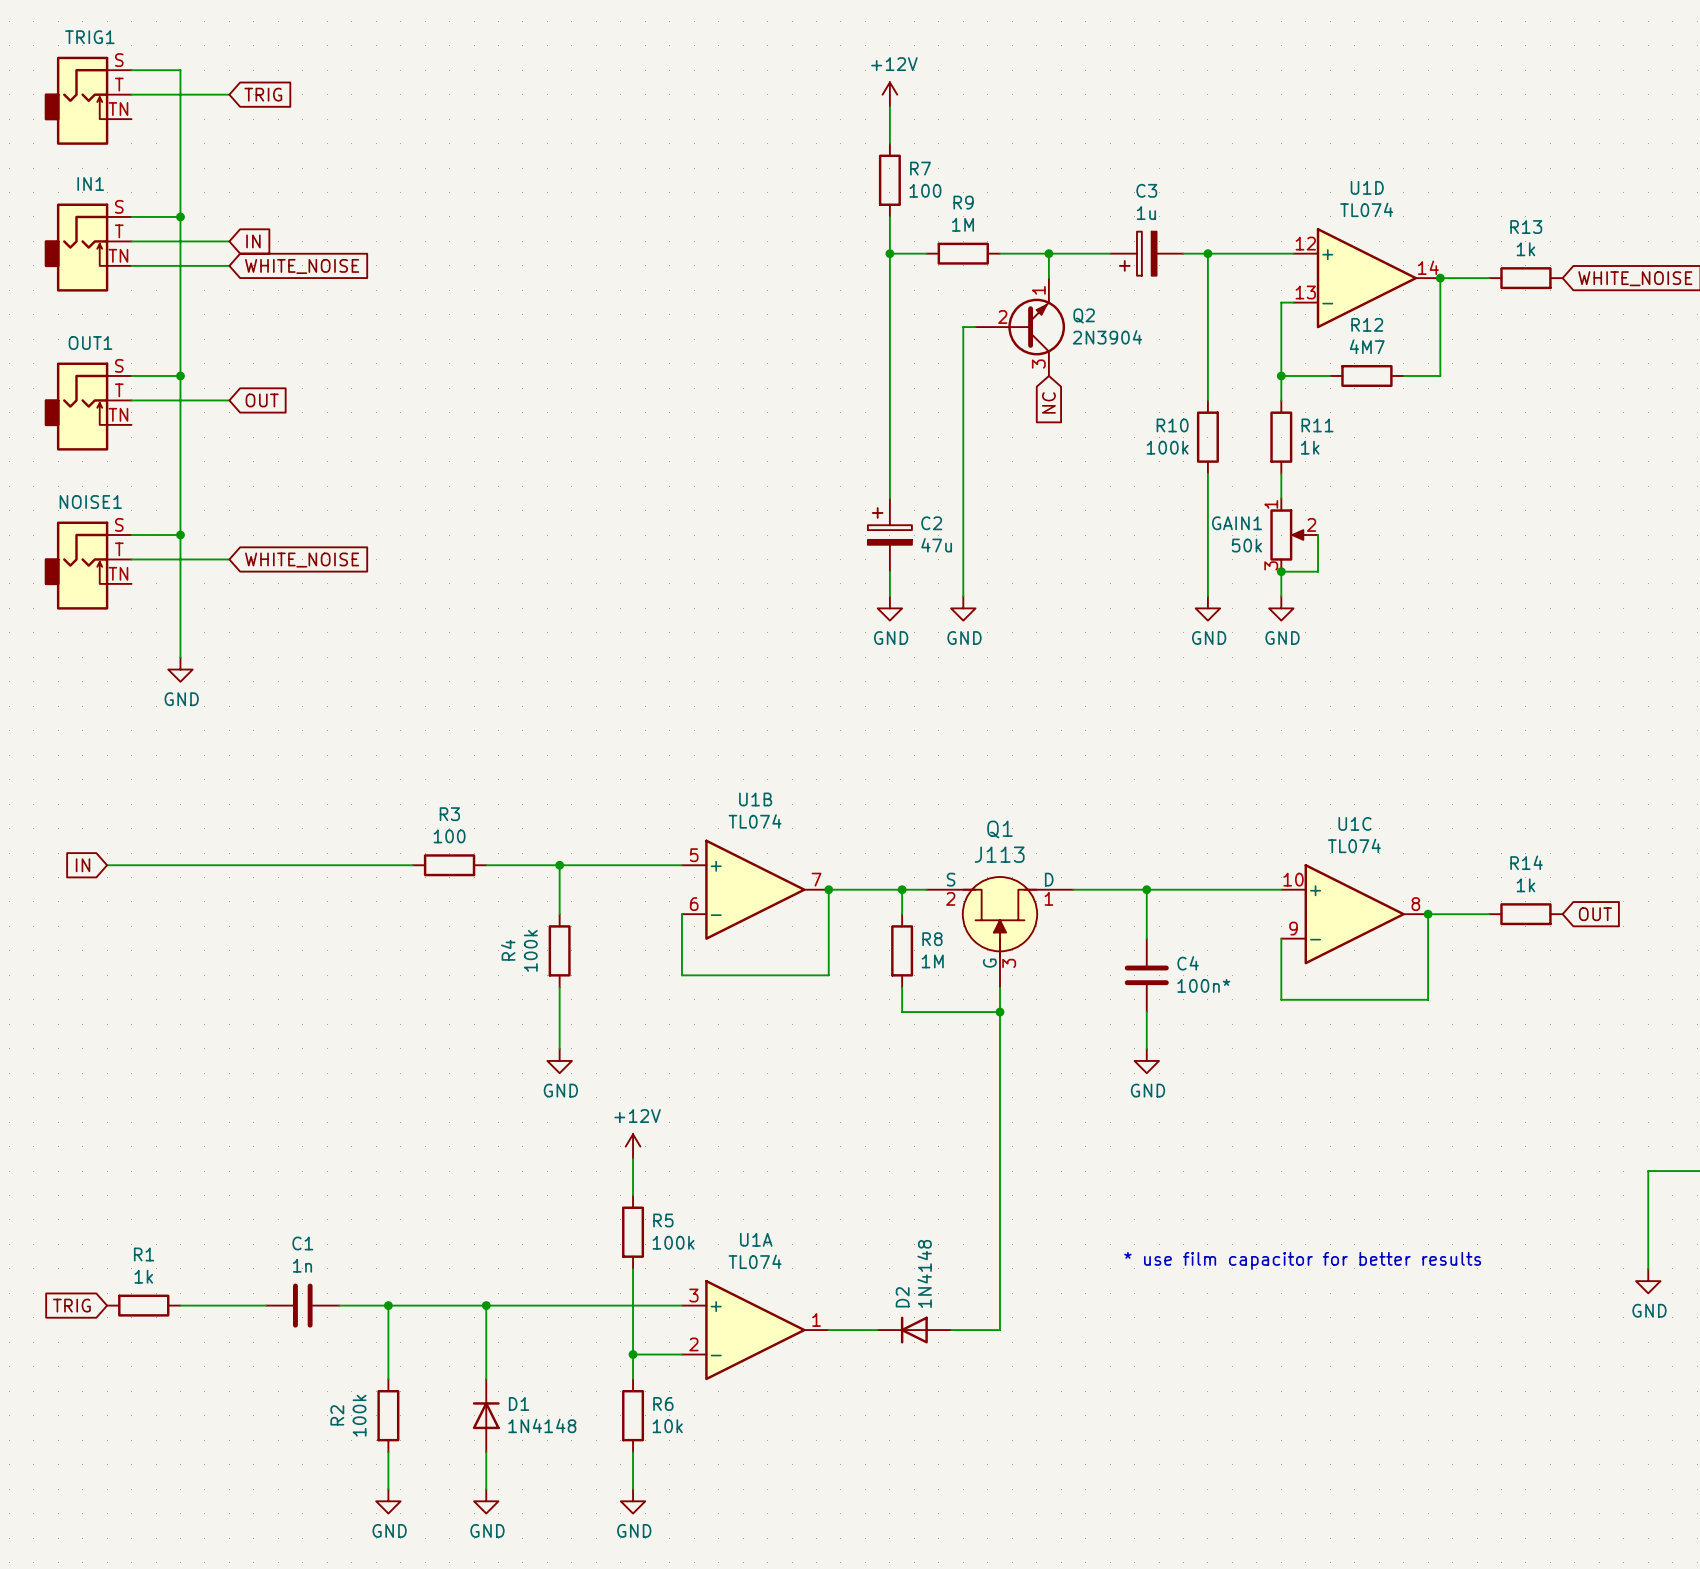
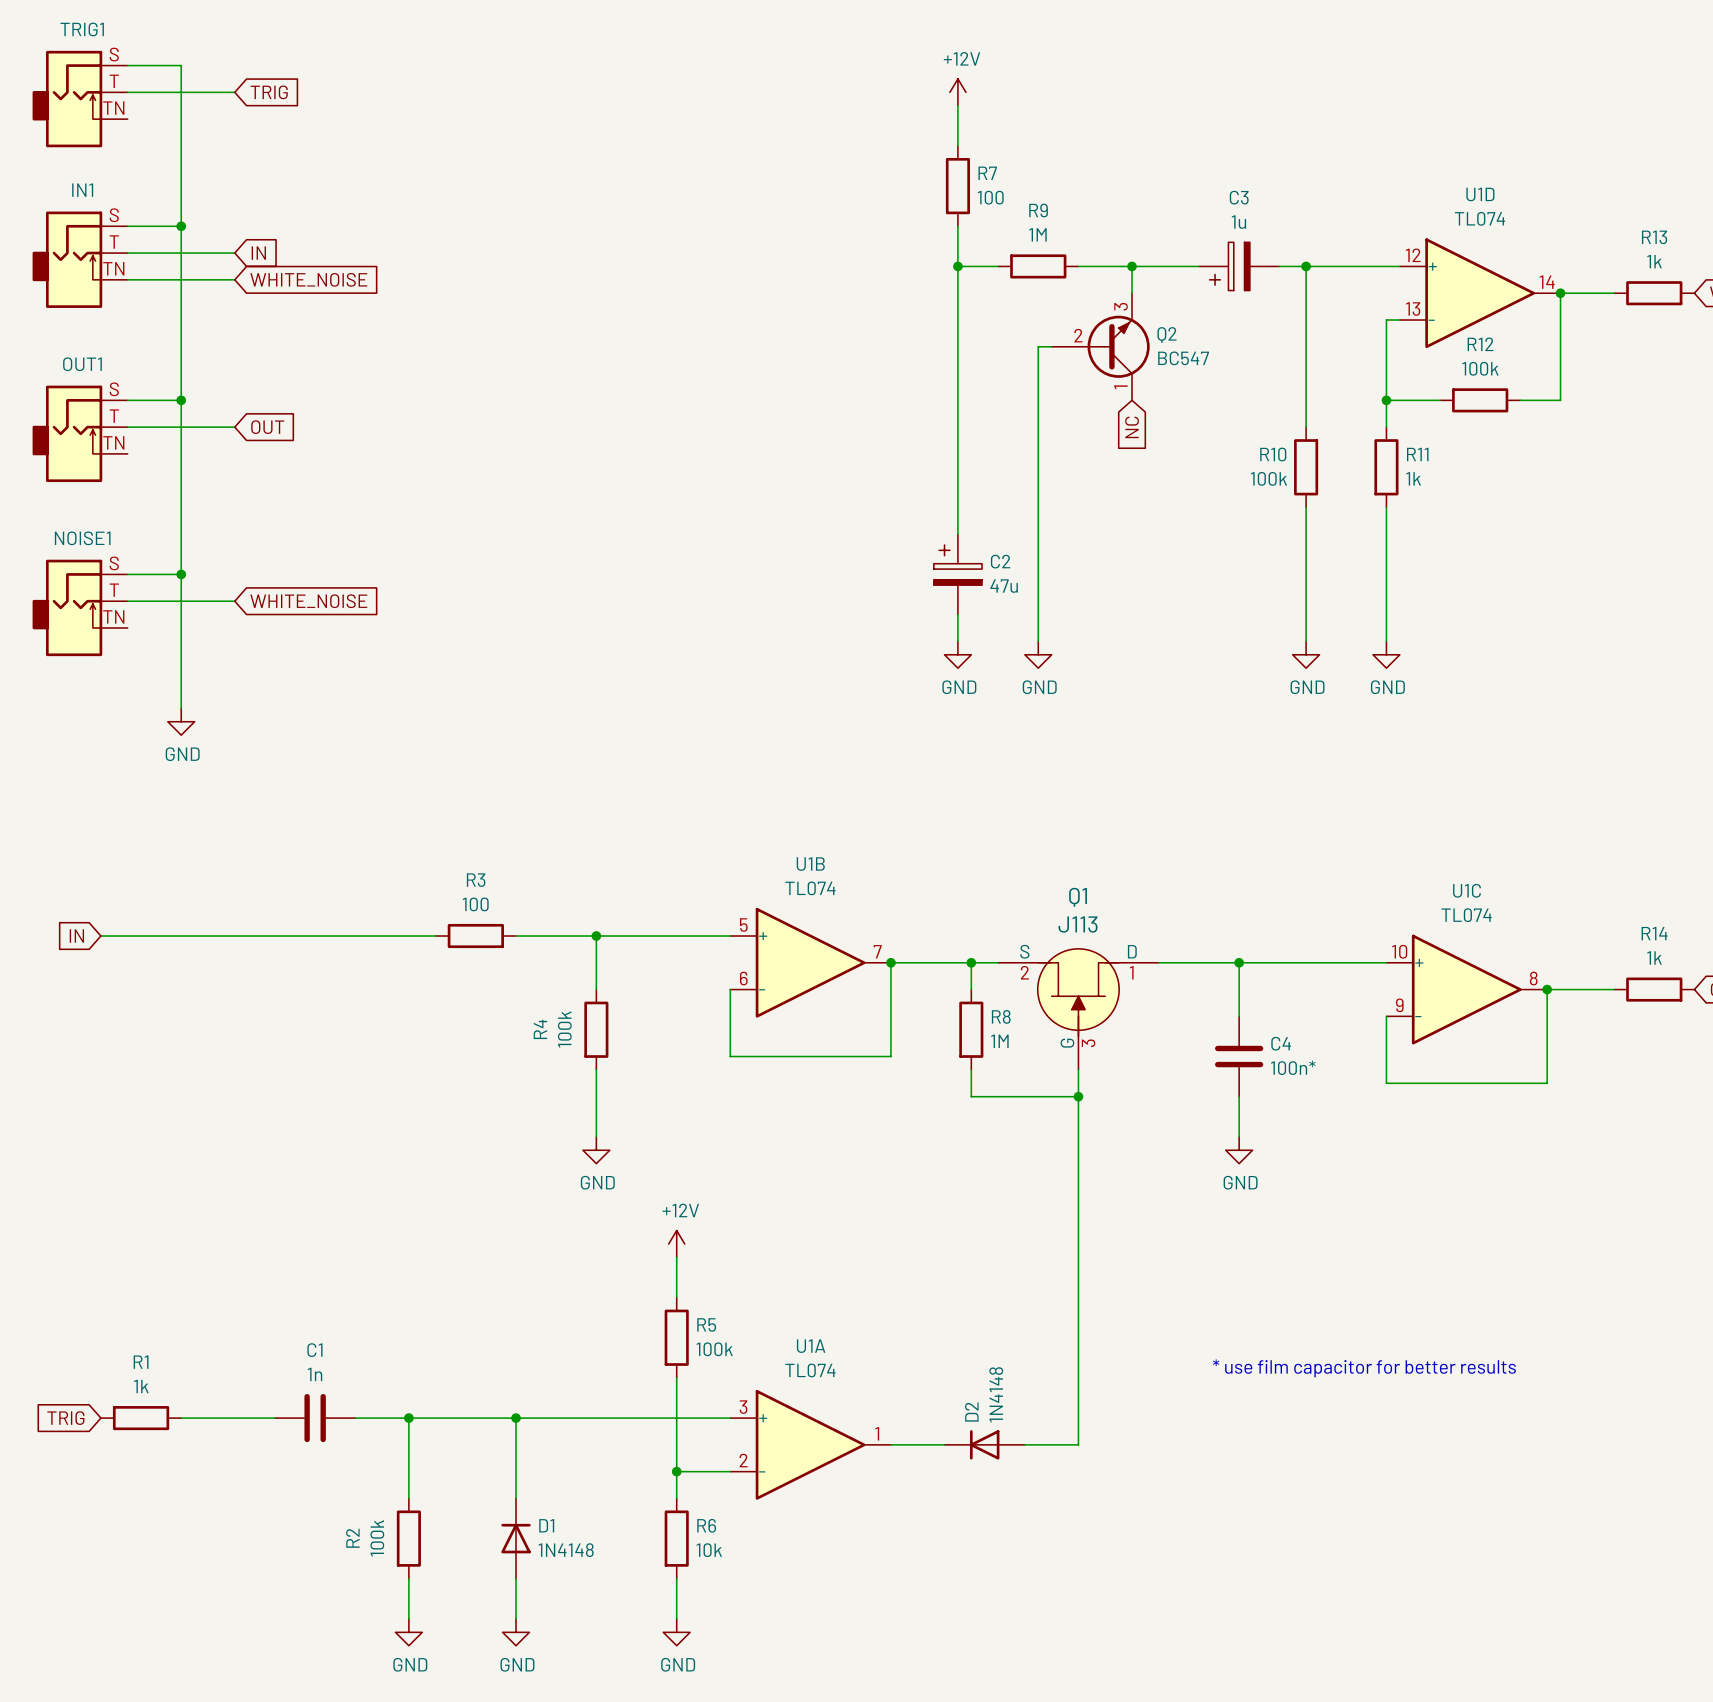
Q2 symbol: [975, 278, 1066, 376] -> [1051, 293, 1150, 401]
Q2 value: 2N3904 (1107, 337) -> BC547 (1183, 358)
R12 value: 4M7 (1367, 346) -> 100k (1480, 368)
GAIN1: 50k (1294, 535) -> none
wire: (1318, 535) (1318, 571) (1281, 571) -> (1386, 534) (1386, 614)
junction: (1281, 571) -> none

